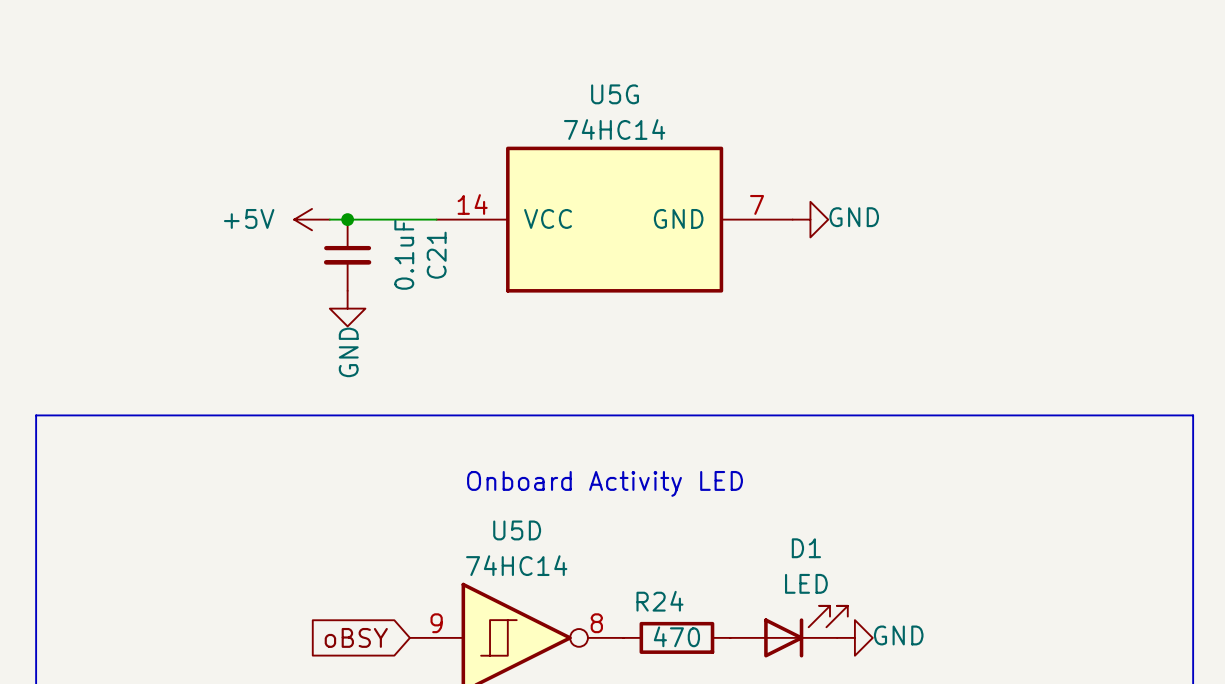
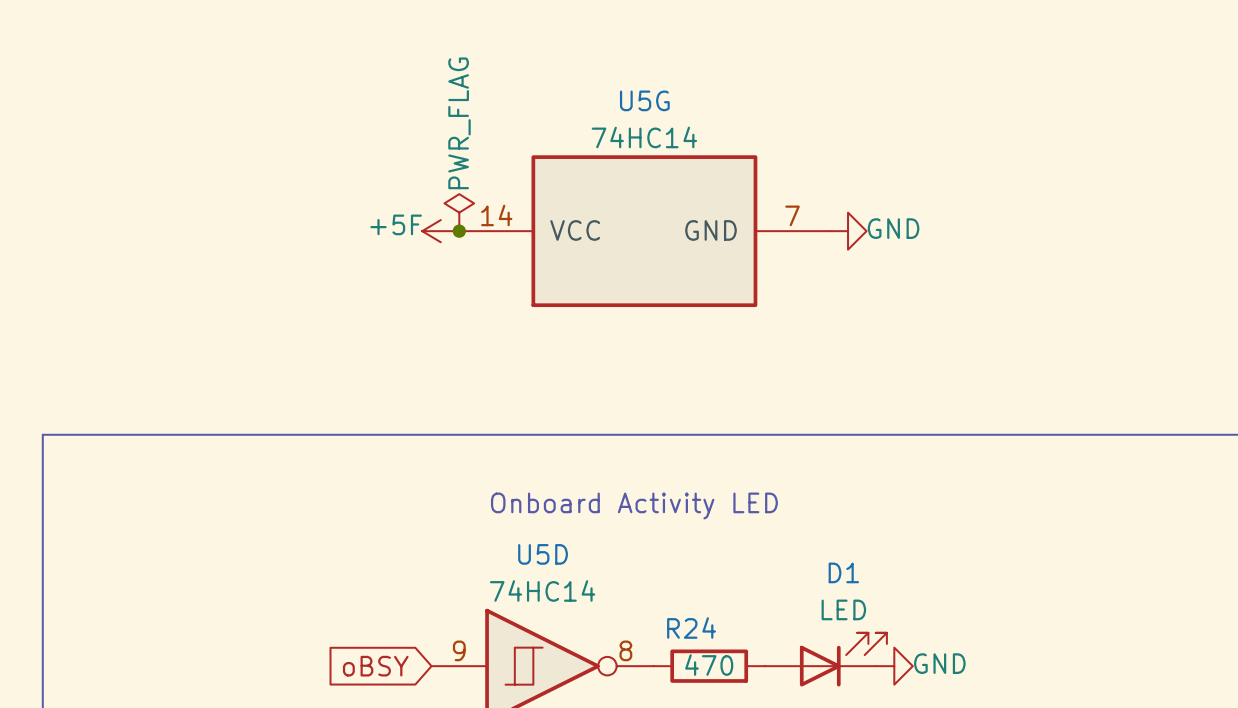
power symbol: none -> PWR_FLAG (459, 212)
power symbol: +5V (312, 219) -> none
wire: (329, 219) (436, 219) -> none
junction: (347, 219) -> none
power symbol: none -> +5F (440, 231)
junction: none -> (459, 231)
C21: 0.1uF (347, 255) -> none
power symbol: GND (347, 308) -> none

